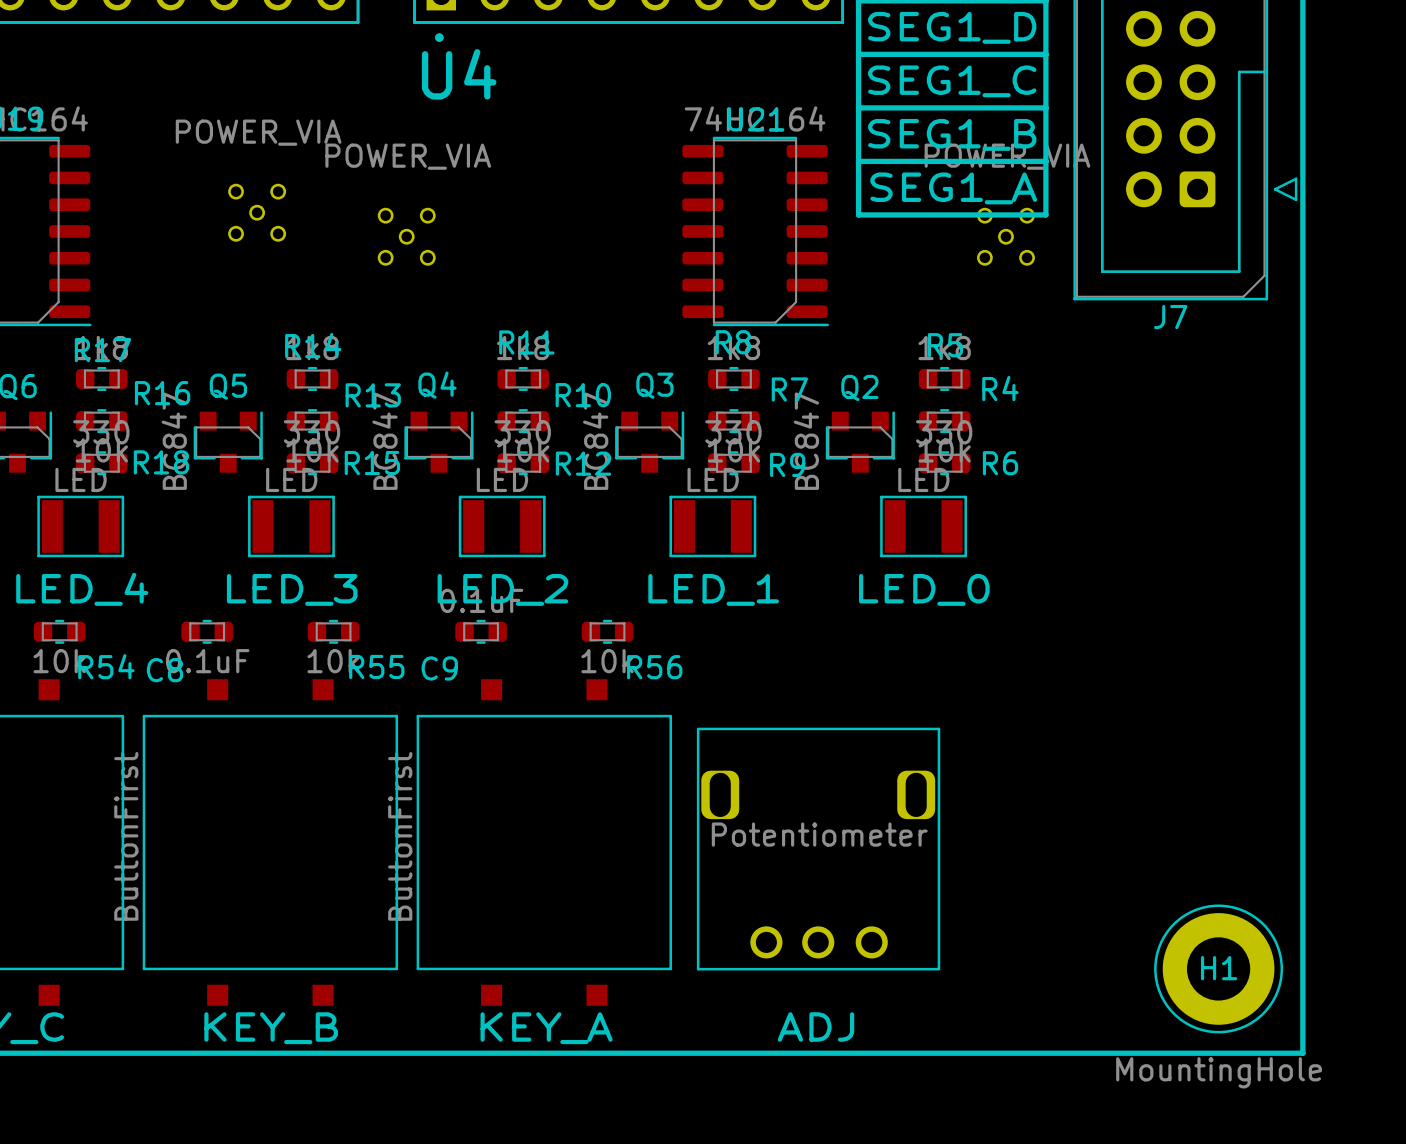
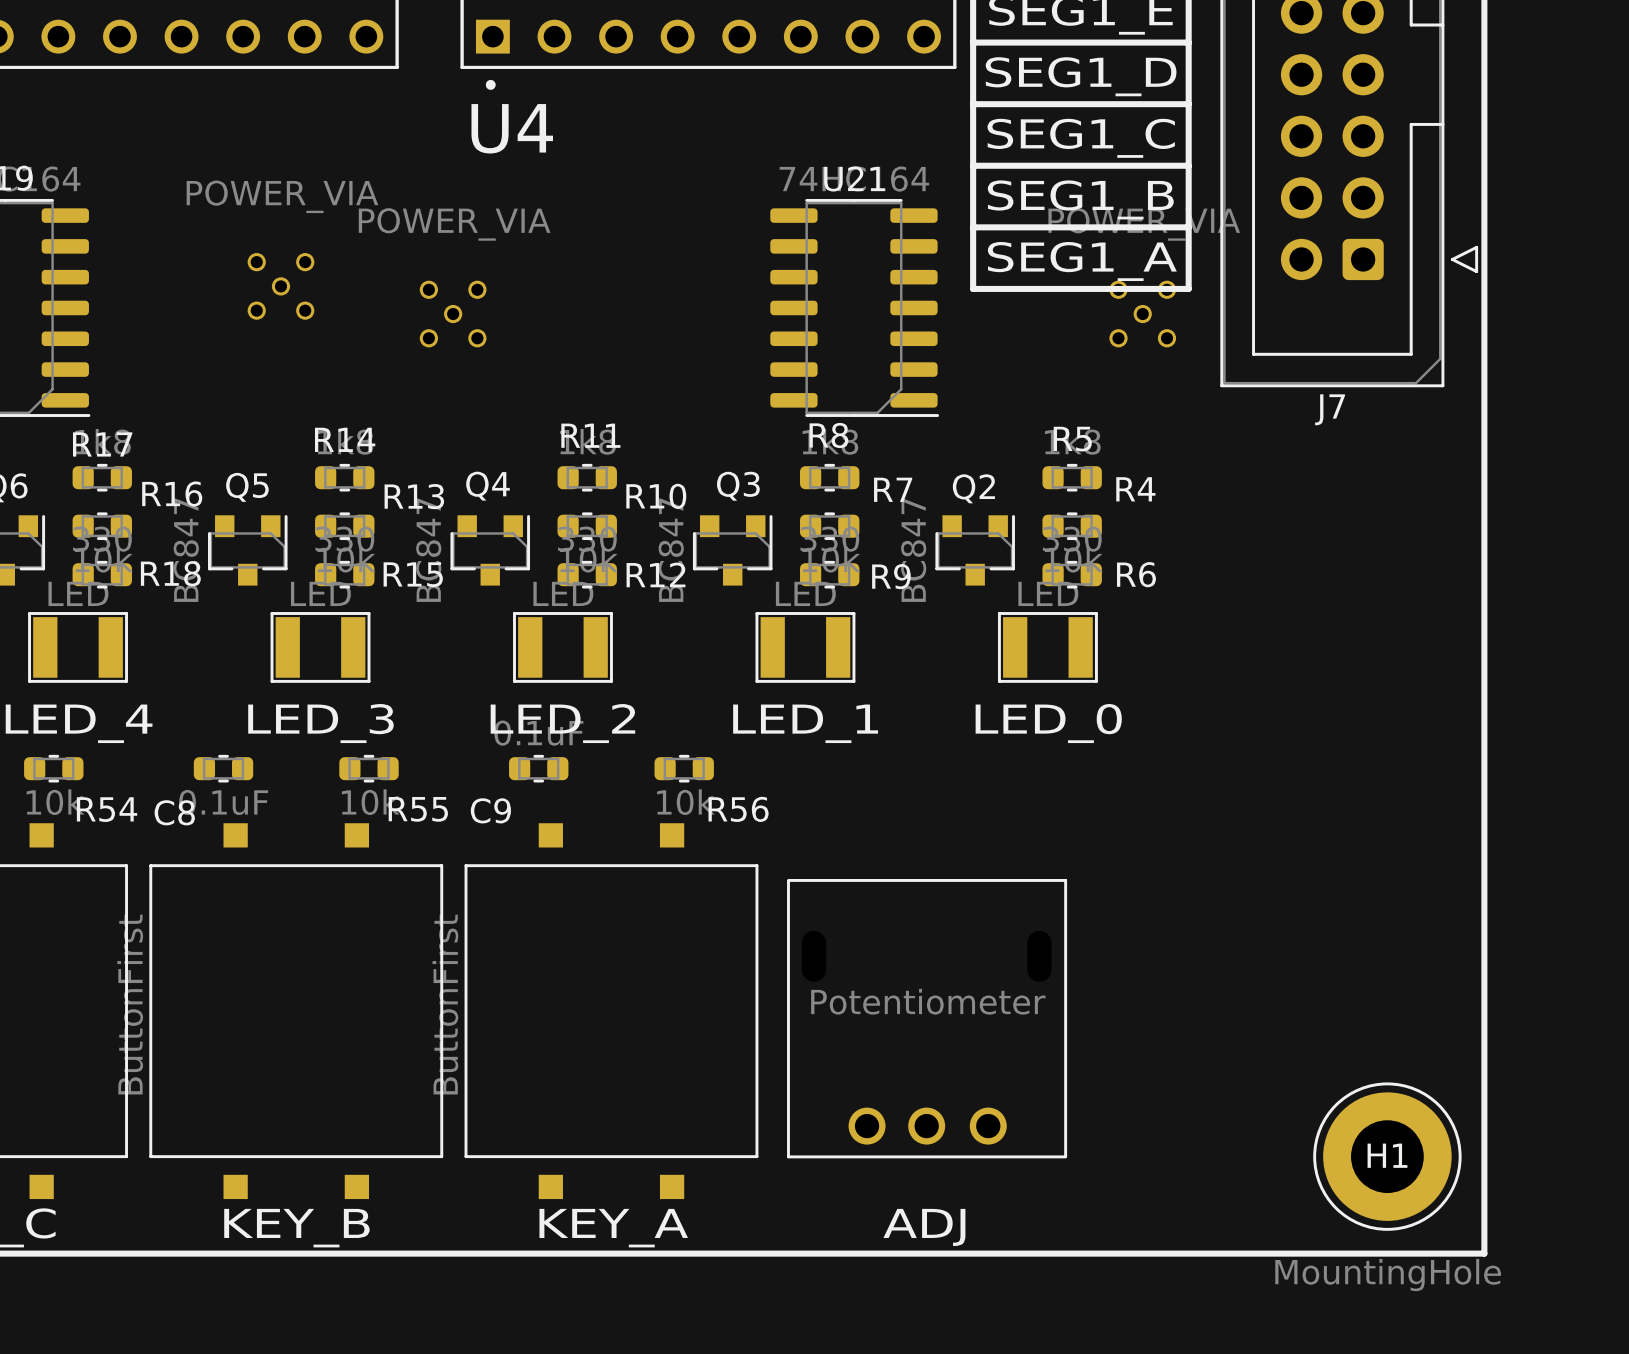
part footprint: [696, 727, 941, 971] -> [787, 879, 1068, 1159]

